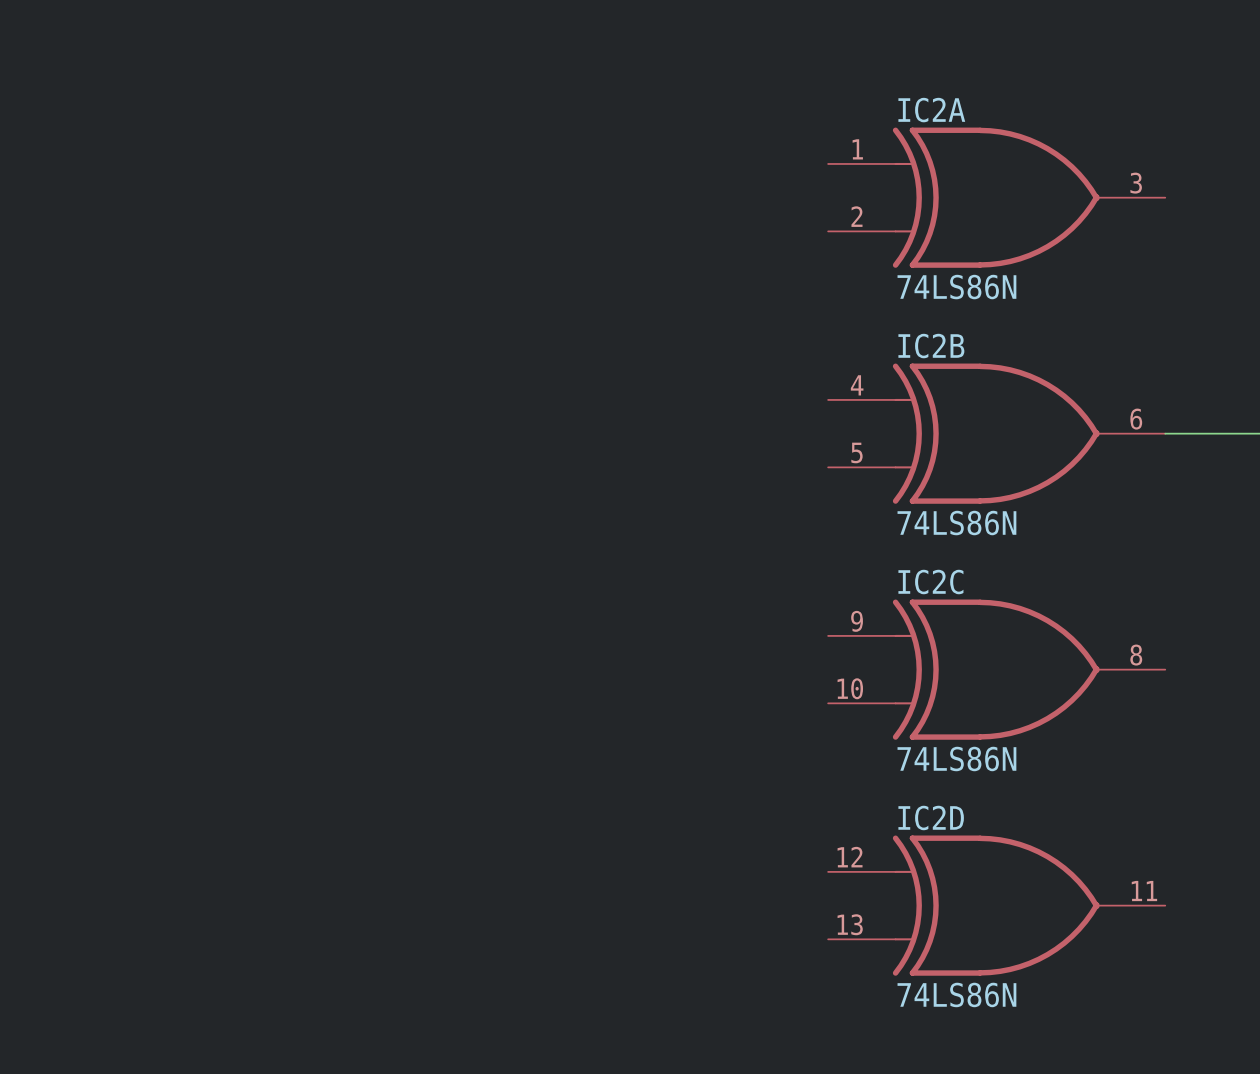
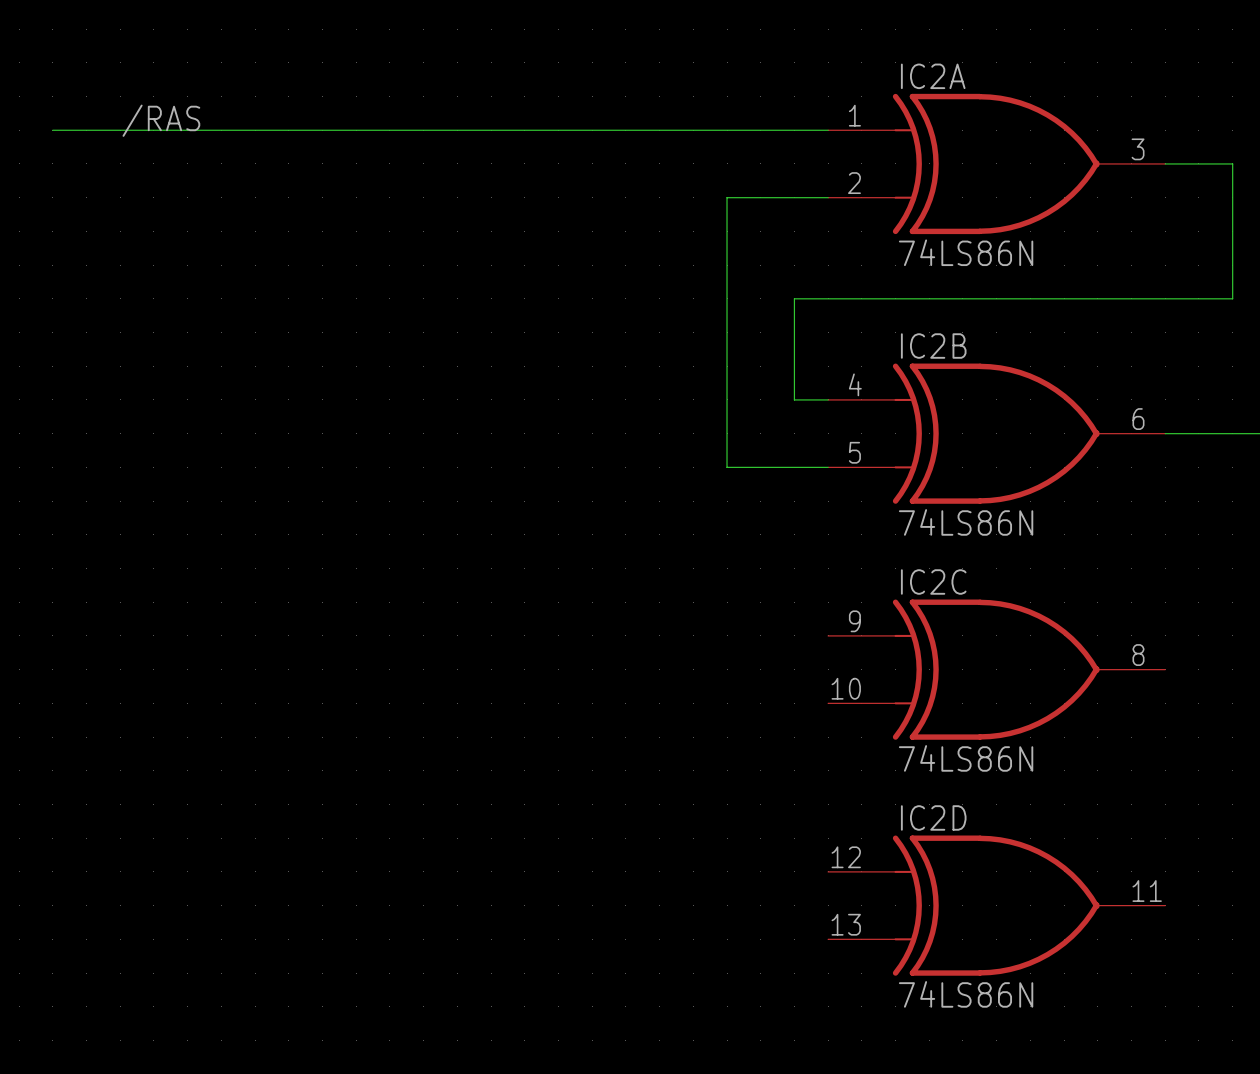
label: none -> /RAS (161, 120)
wire: none -> (52, 130) (828, 130)
wire: none -> (1165, 163) (1232, 163) (1232, 298) (794, 298) (794, 399) (828, 399)
wire: none -> (828, 197) (727, 197) (727, 467) (828, 467)
IC2A position: (996, 197) -> (996, 163)

